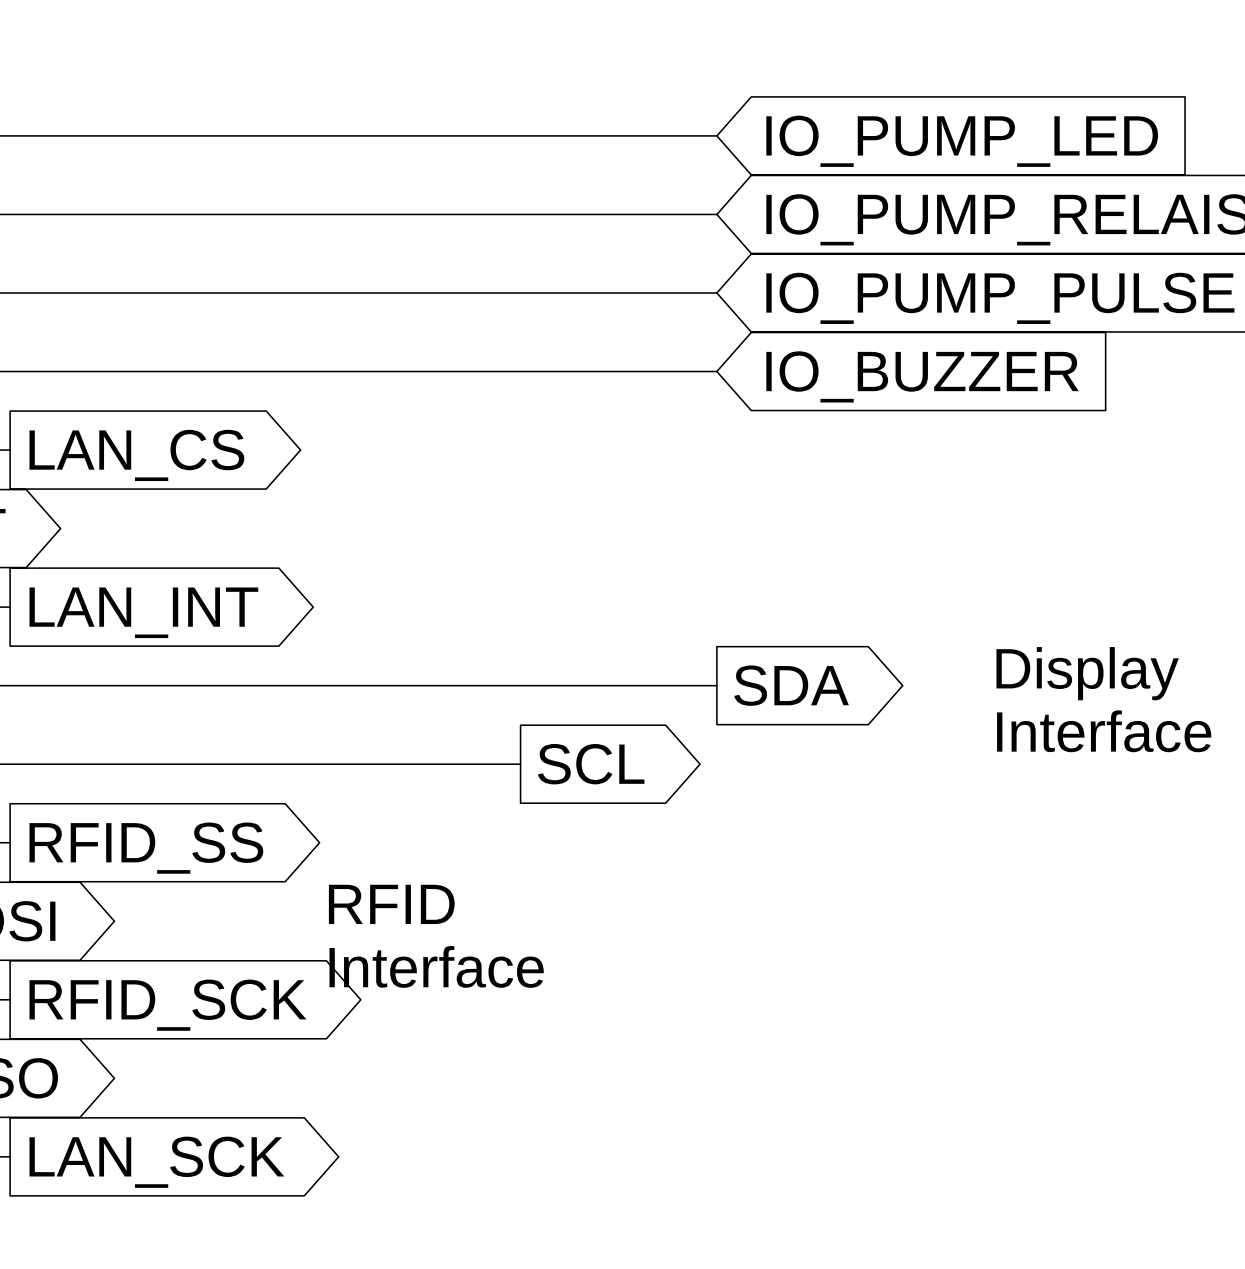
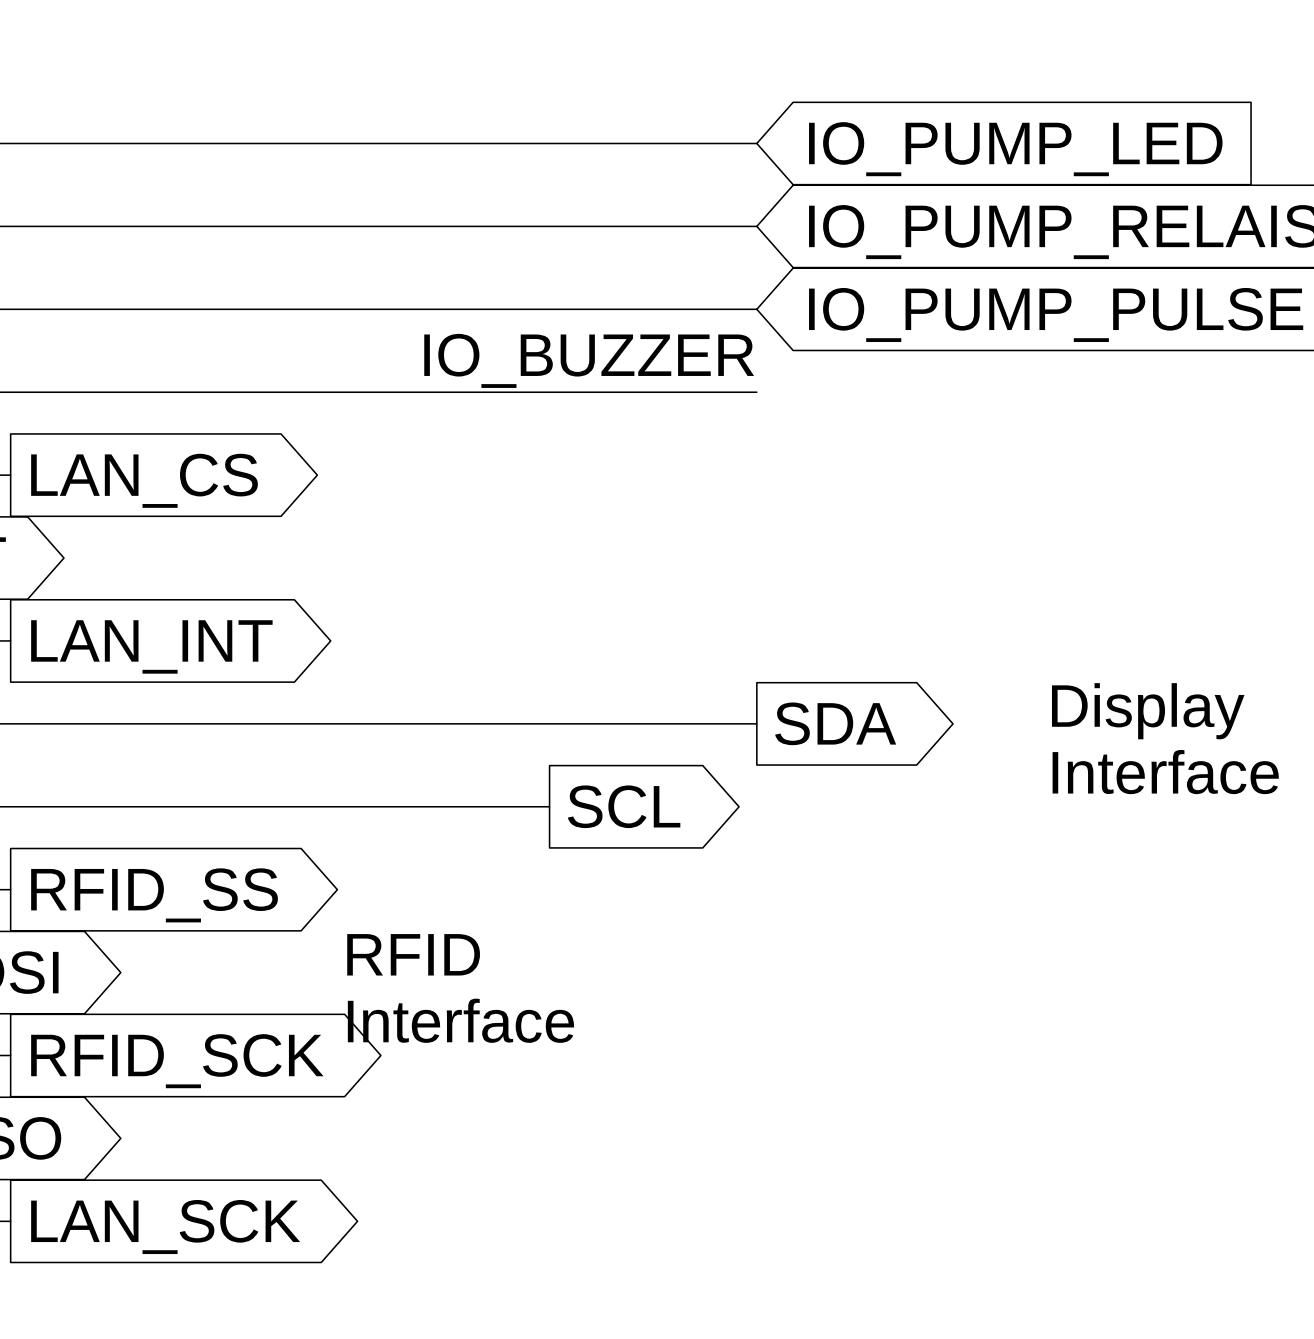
label: none -> IO_BUZZER (589, 360)
global label: IO_BUZZER (922, 376) -> none

